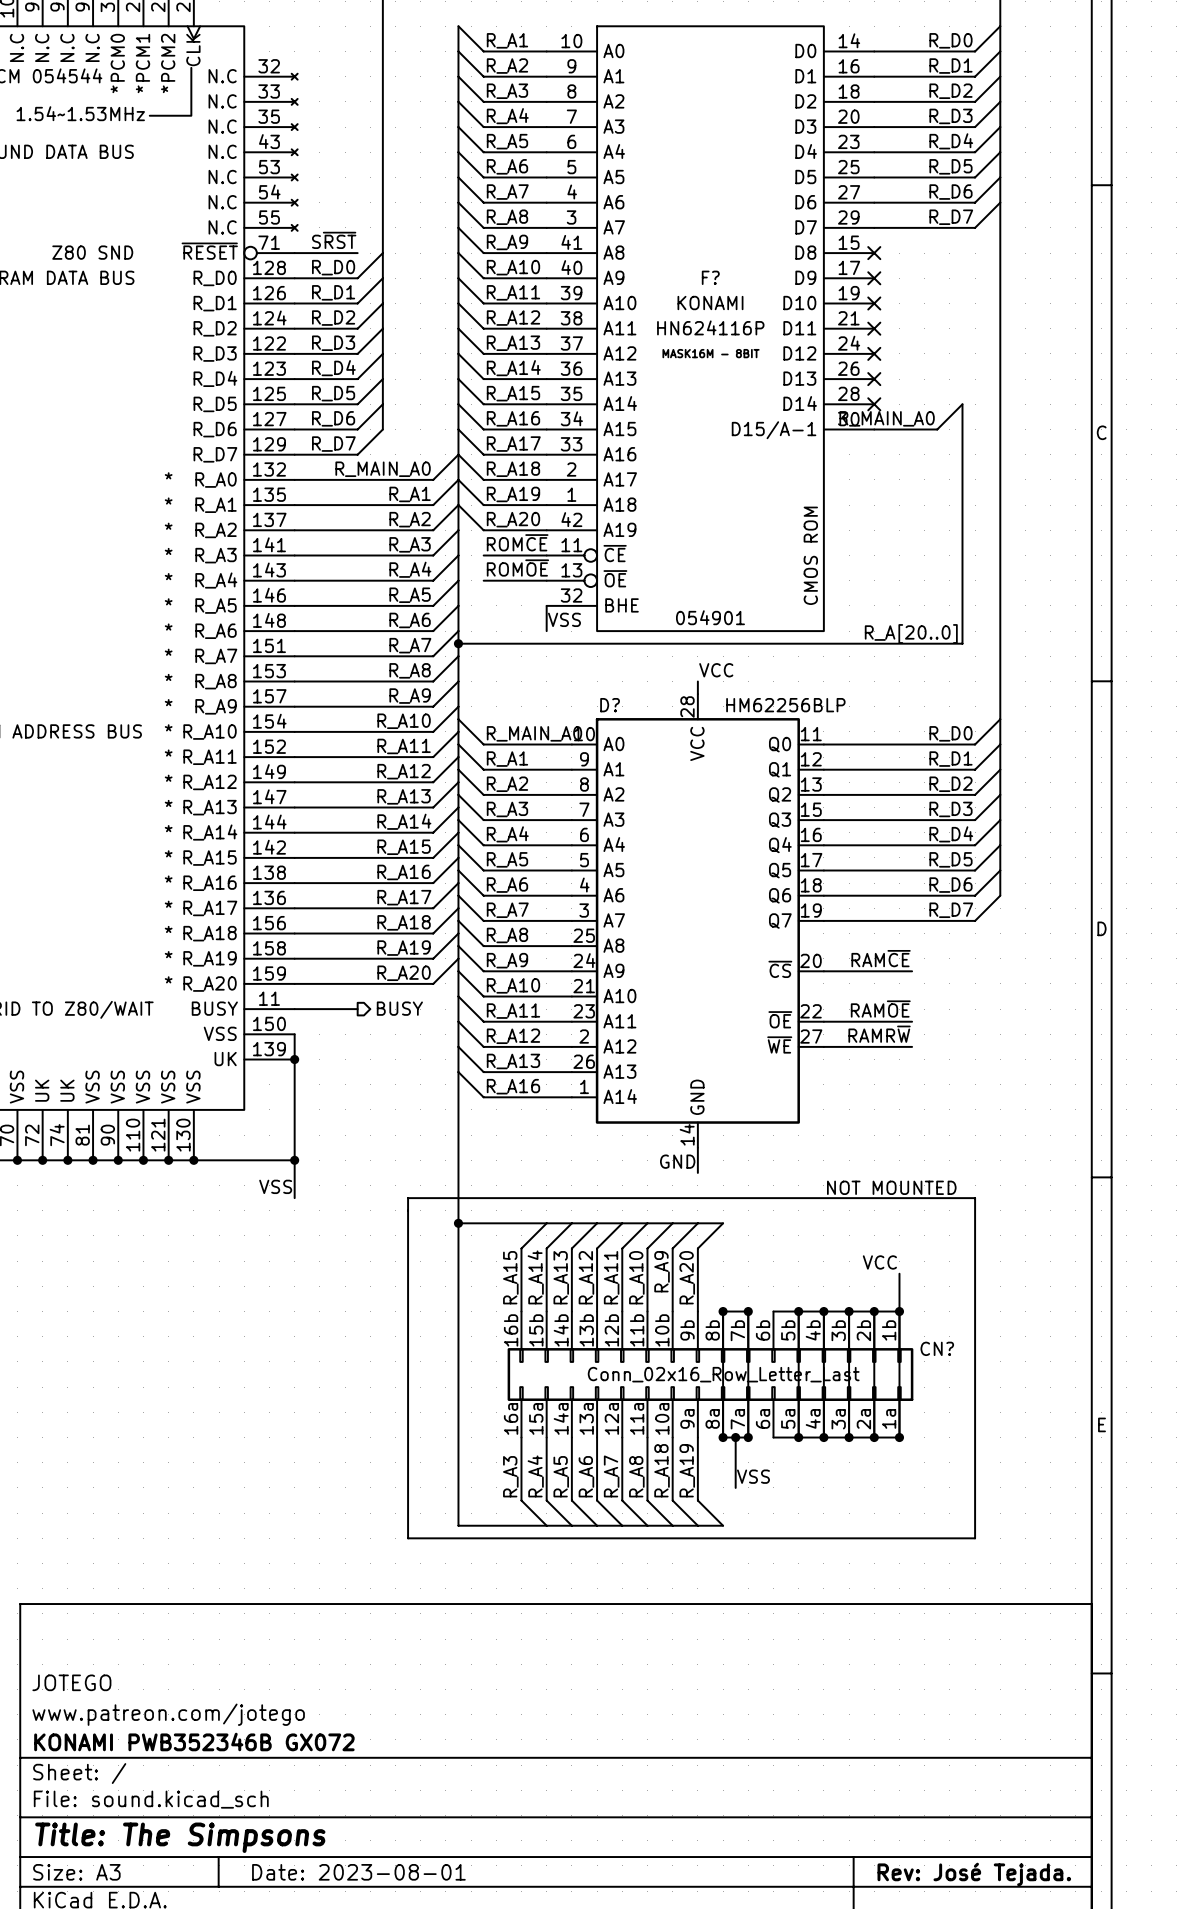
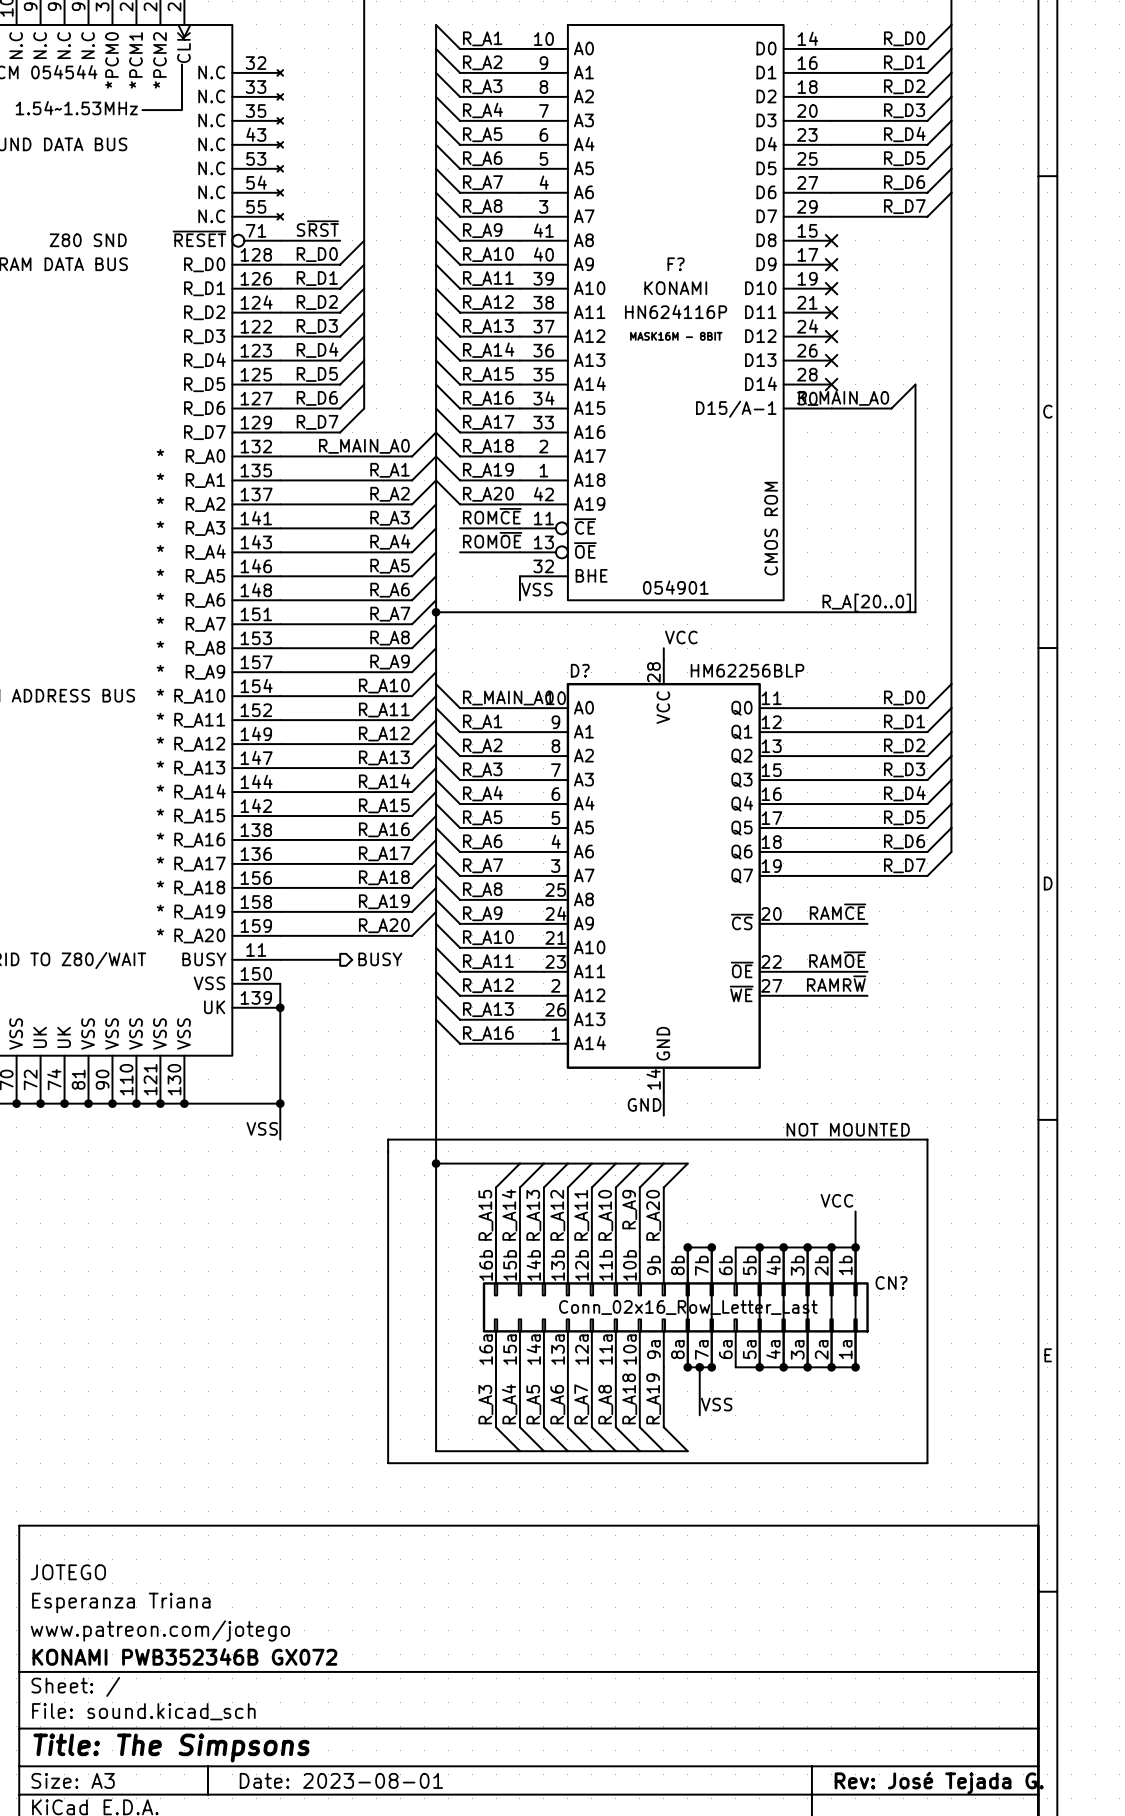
title block: none -> JOTEGO (68, 1572)
title block: JOTEGO (71, 1682) -> Esperanza Triana (121, 1603)
title block: Rev: José Tejada. (974, 1874) -> Rev: José Tejada G. (939, 1782)

